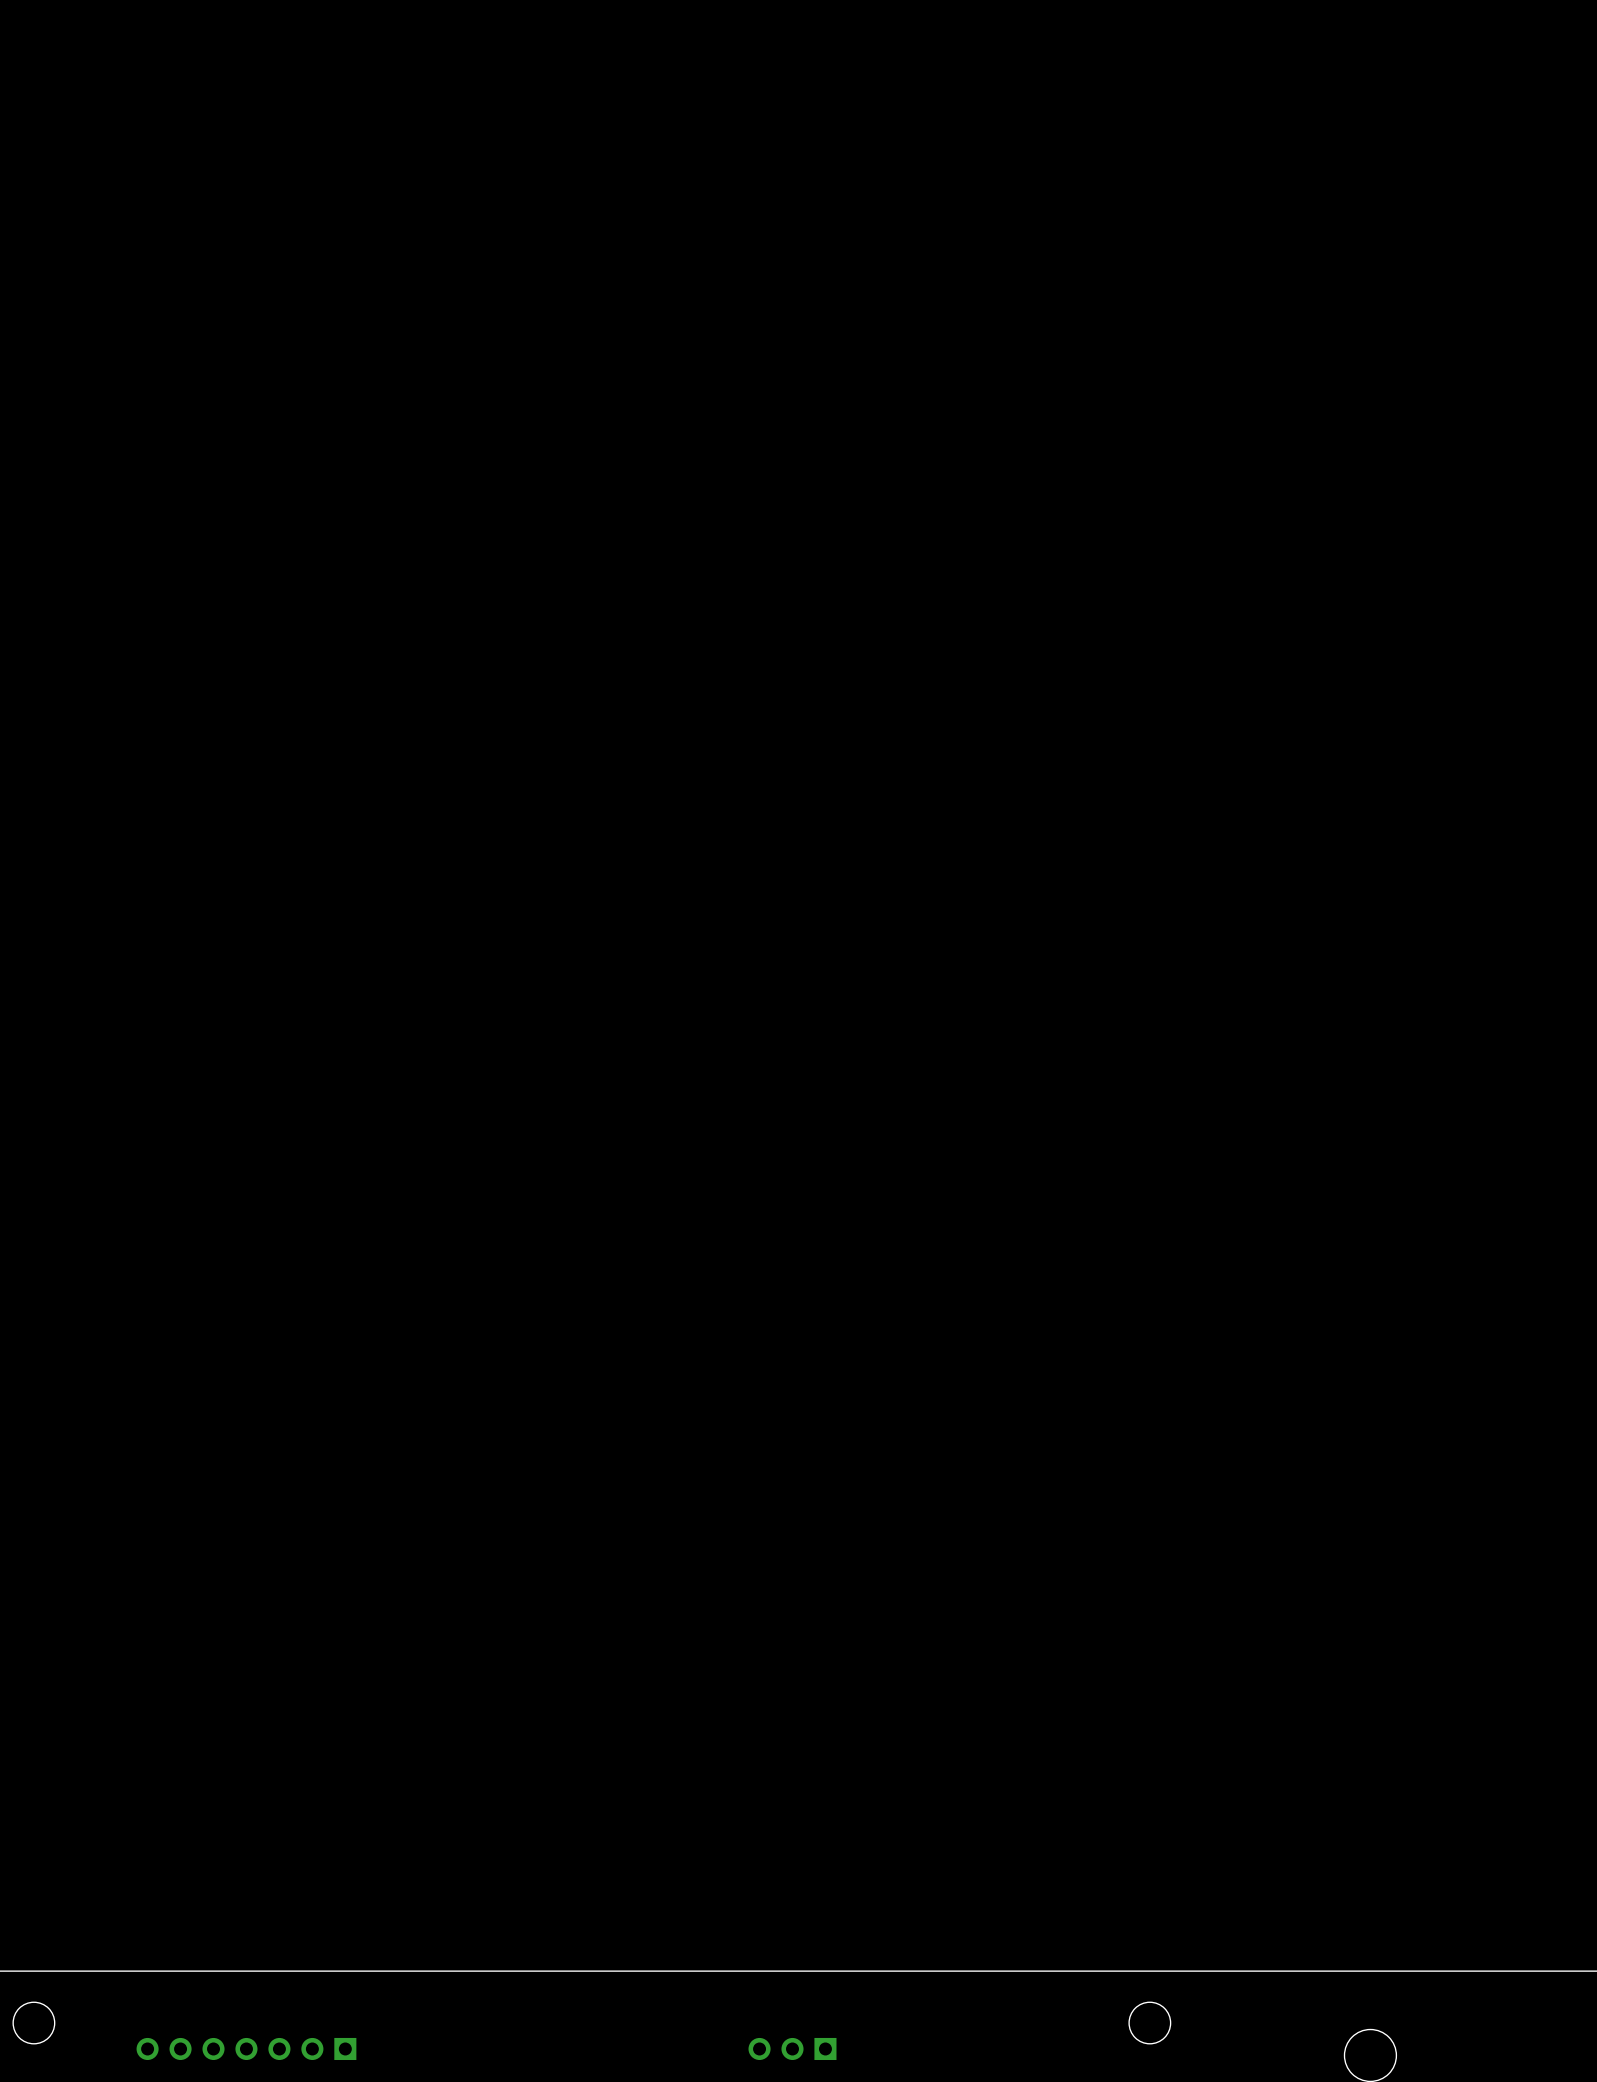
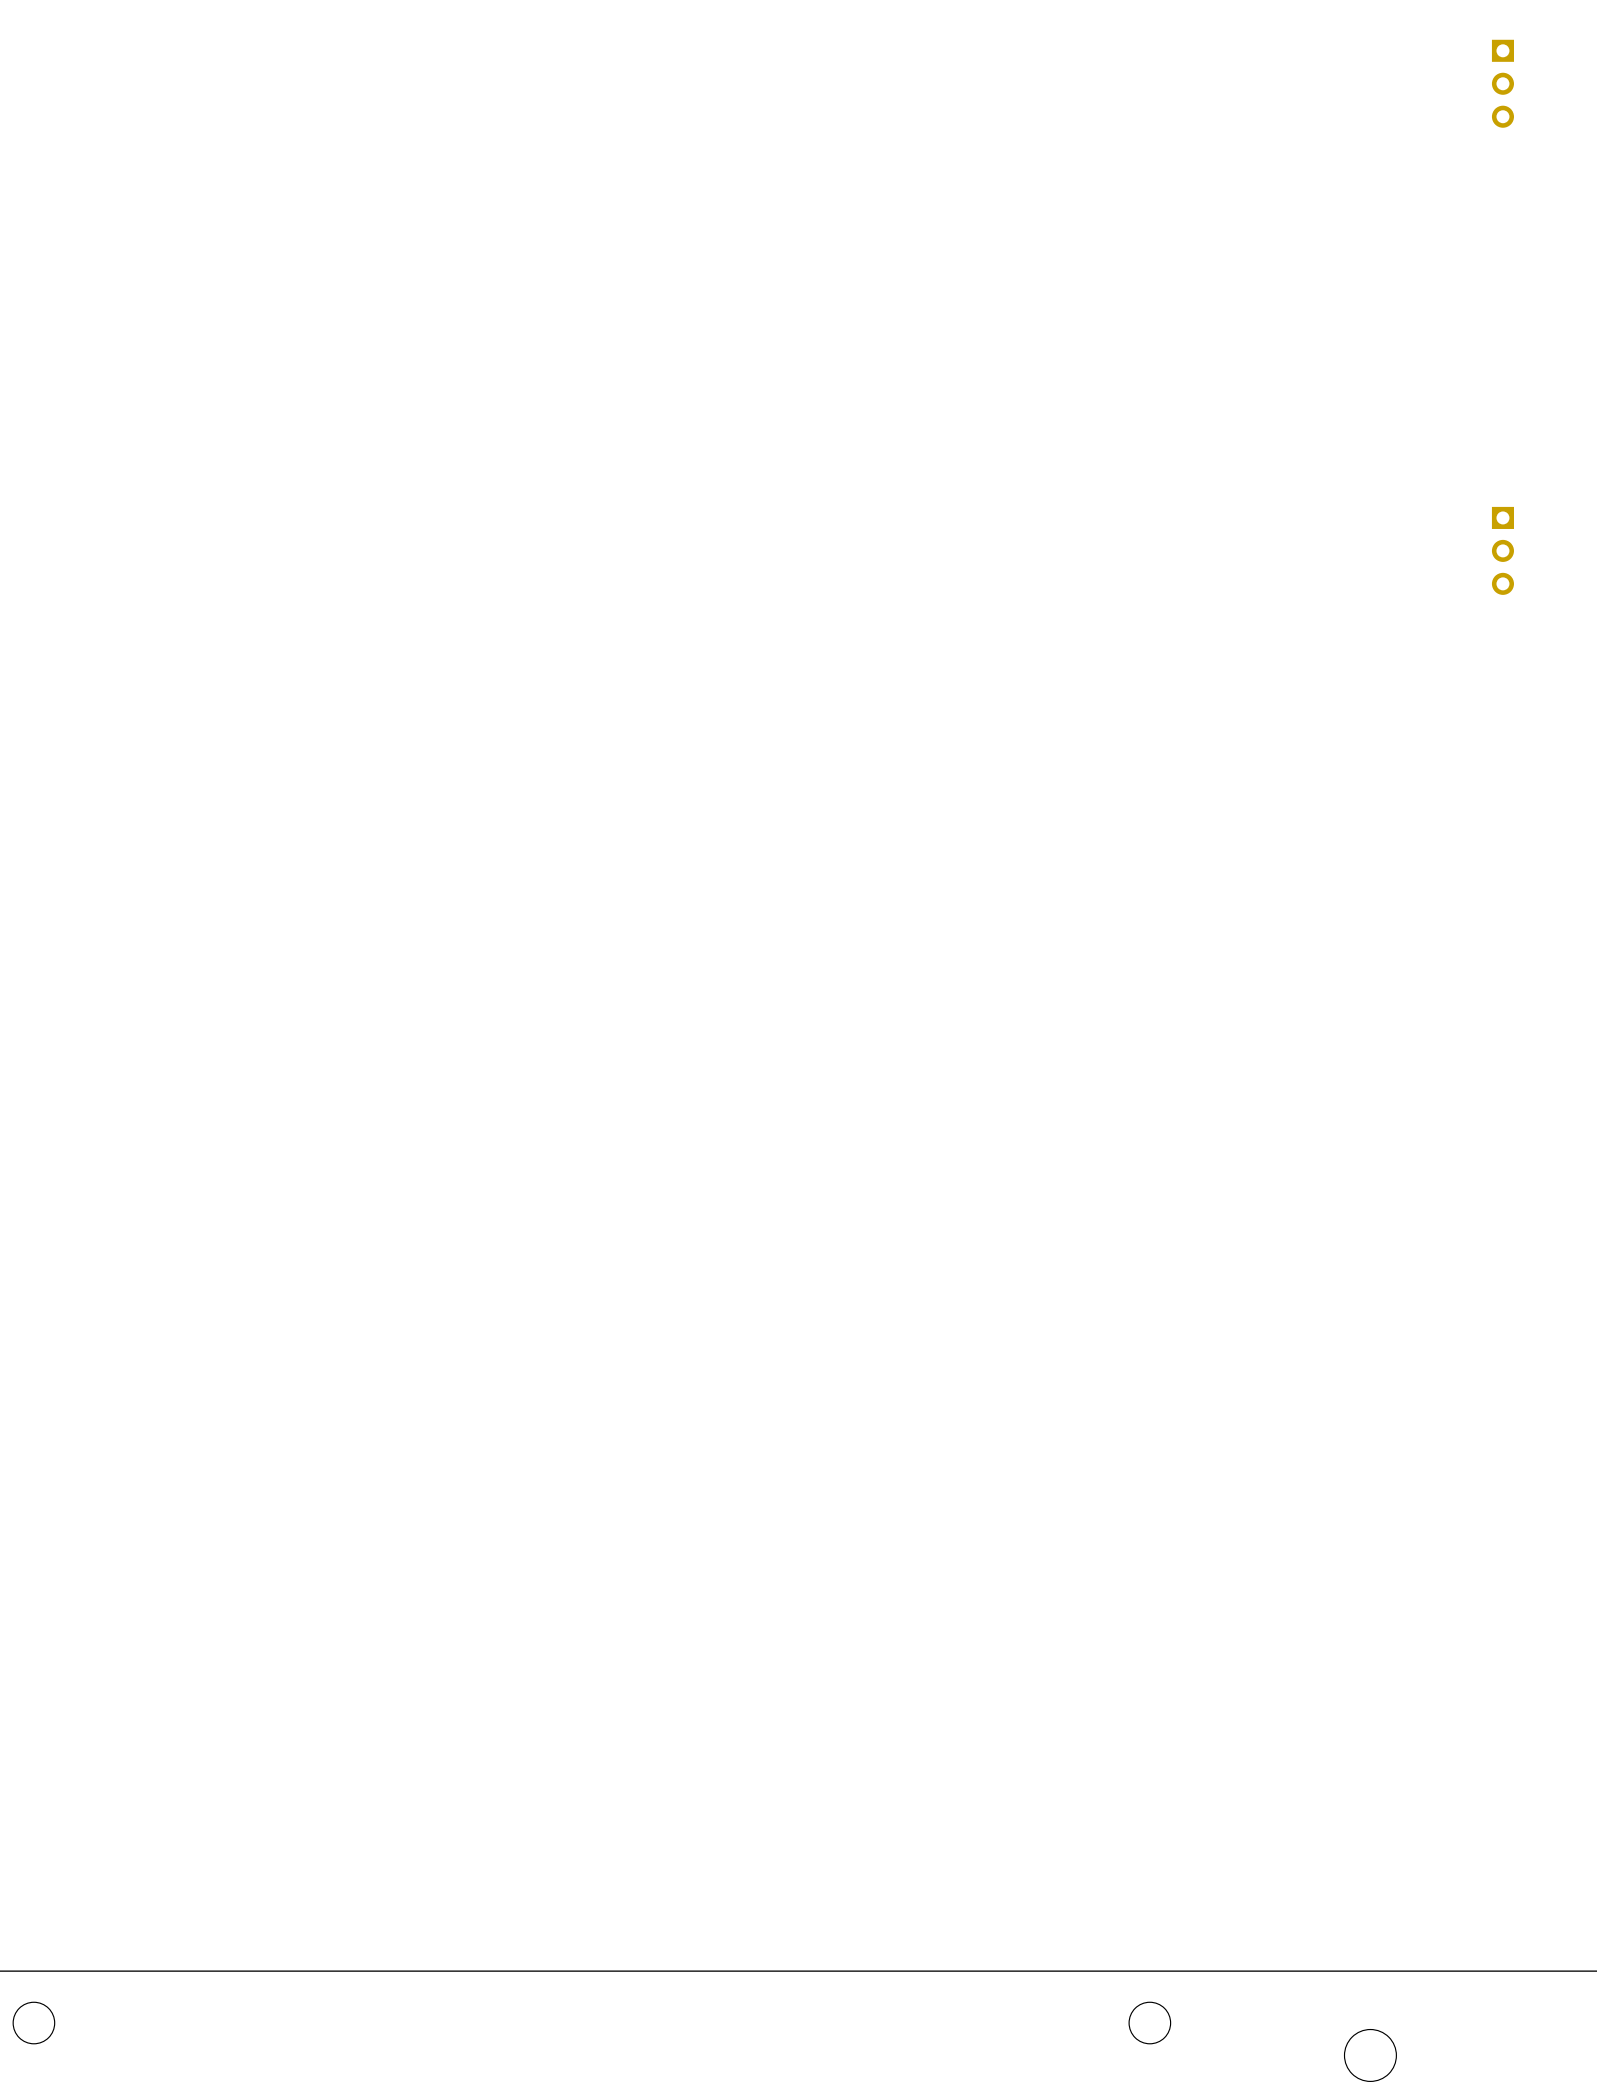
part: none -> (1502, 83)
part: none -> (1502, 550)
part: (246, 2048) -> none
part: (792, 2048) -> none

